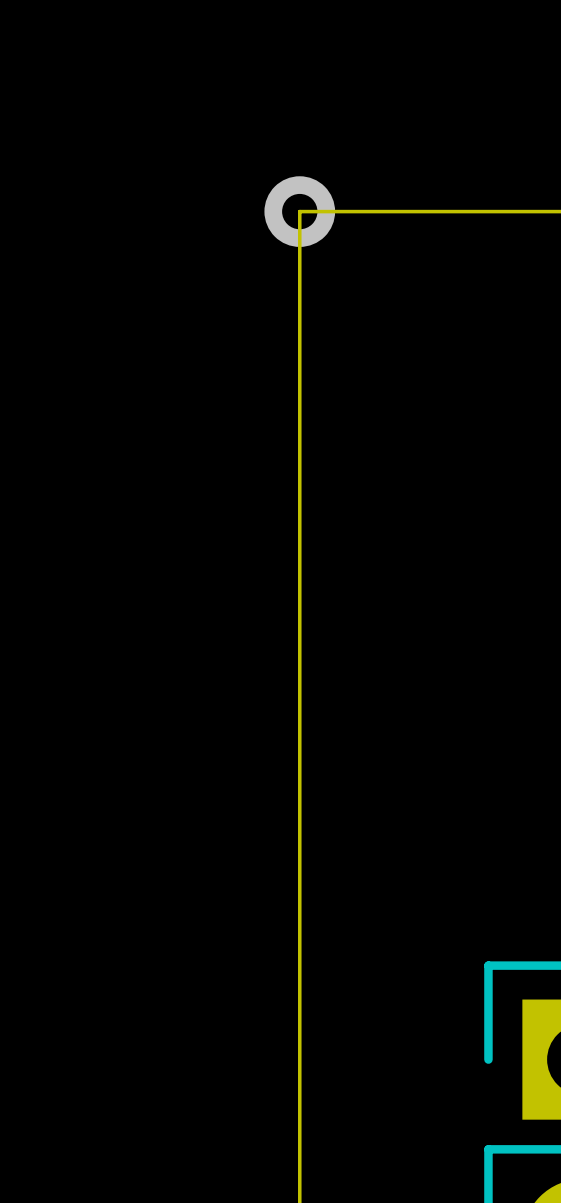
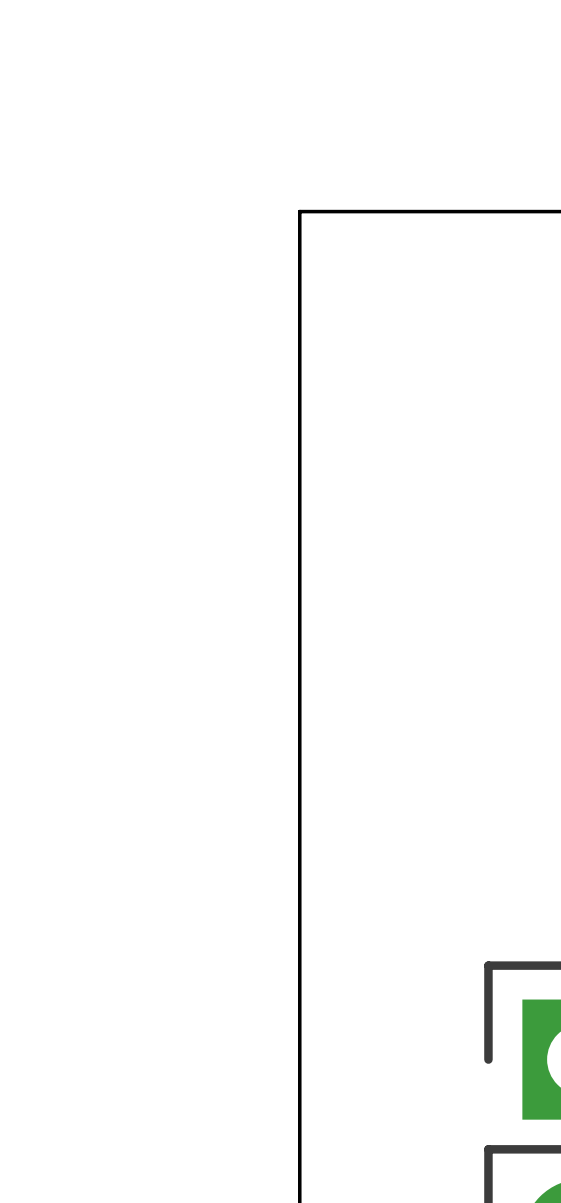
via: (299, 211) -> none

